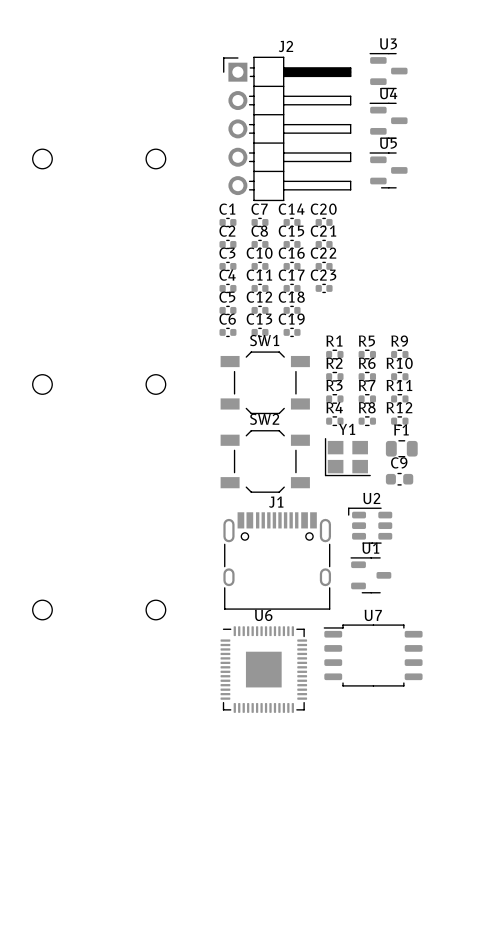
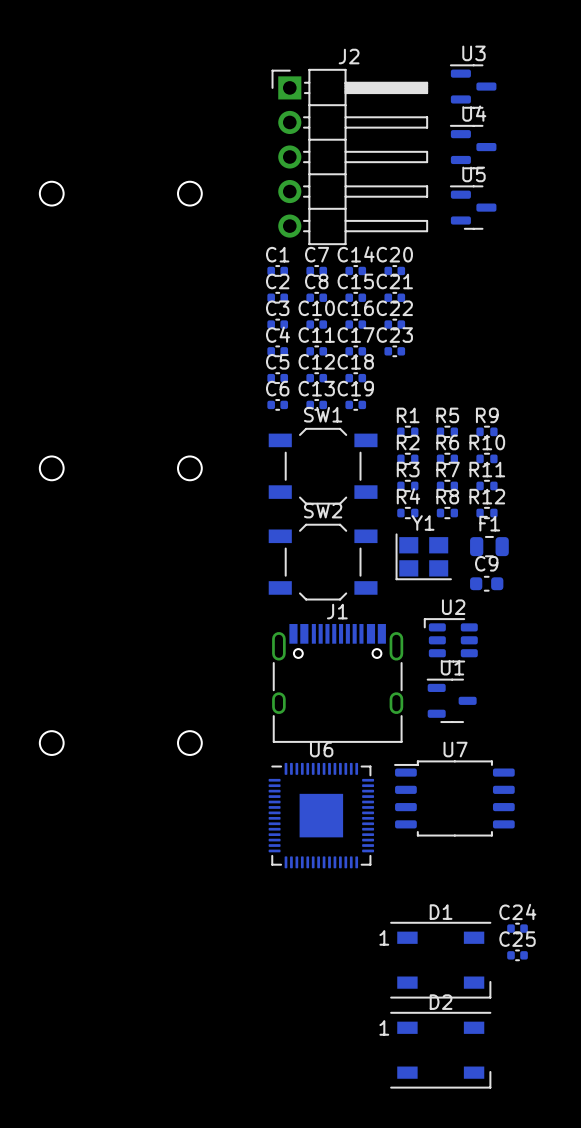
C24: none -> (517, 928)
C25: none -> (517, 955)
D1: none -> (440, 960)
D2: none -> (440, 1050)

